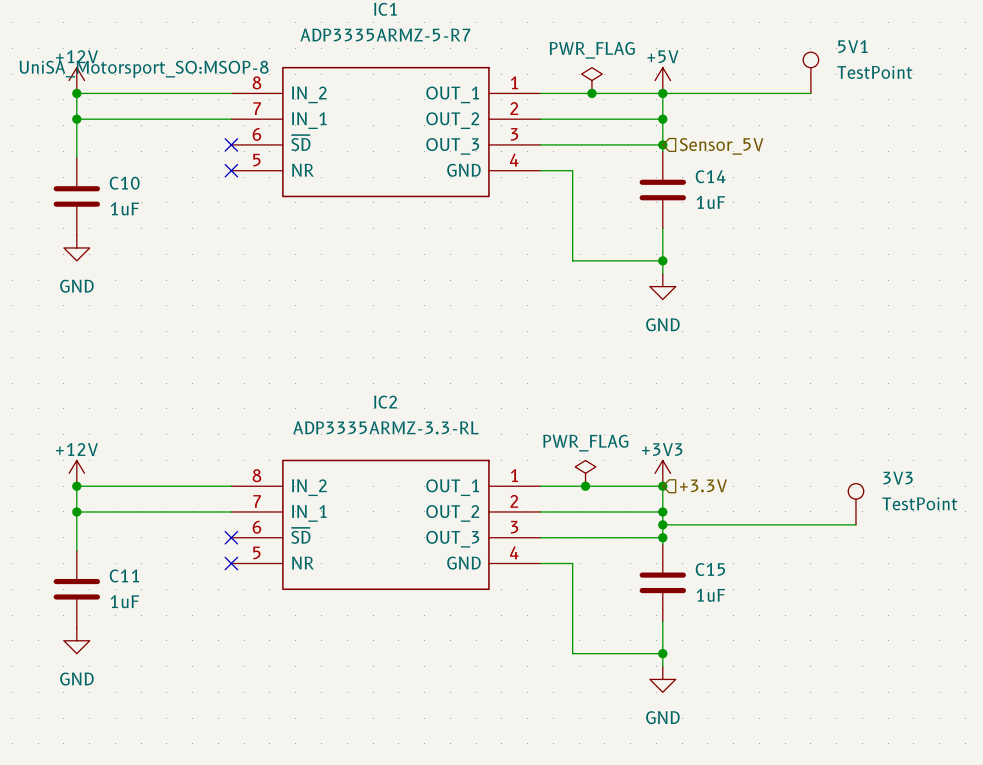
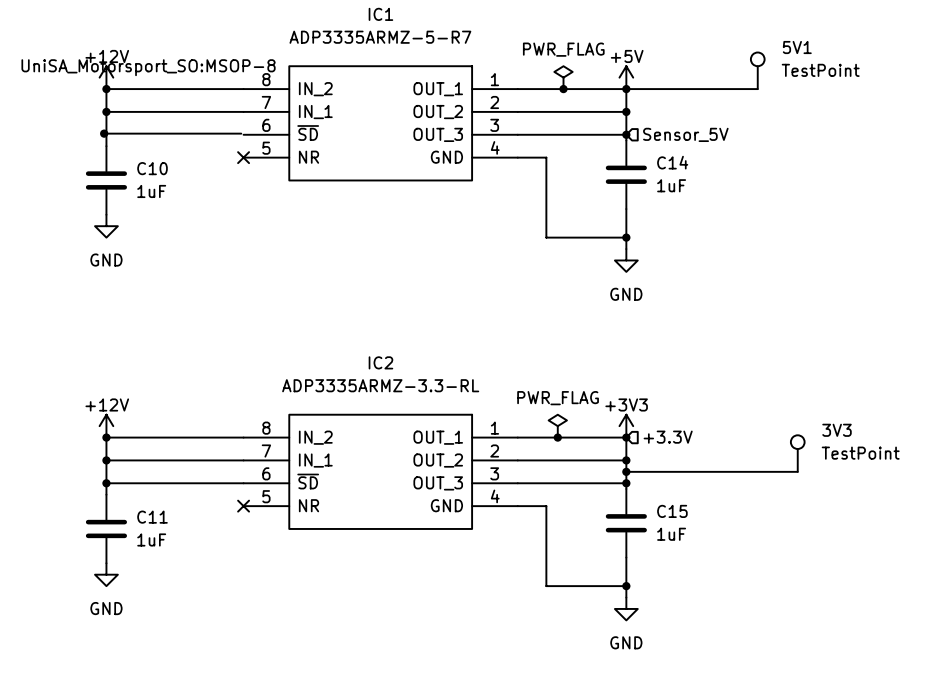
wire: none -> (104, 133) (241, 133)
junction: none -> (104, 133)
no-connect mark: (231, 144) -> none
wire: none -> (106, 483) (243, 483)
junction: none -> (106, 483)
no-connect mark: (231, 537) -> none

